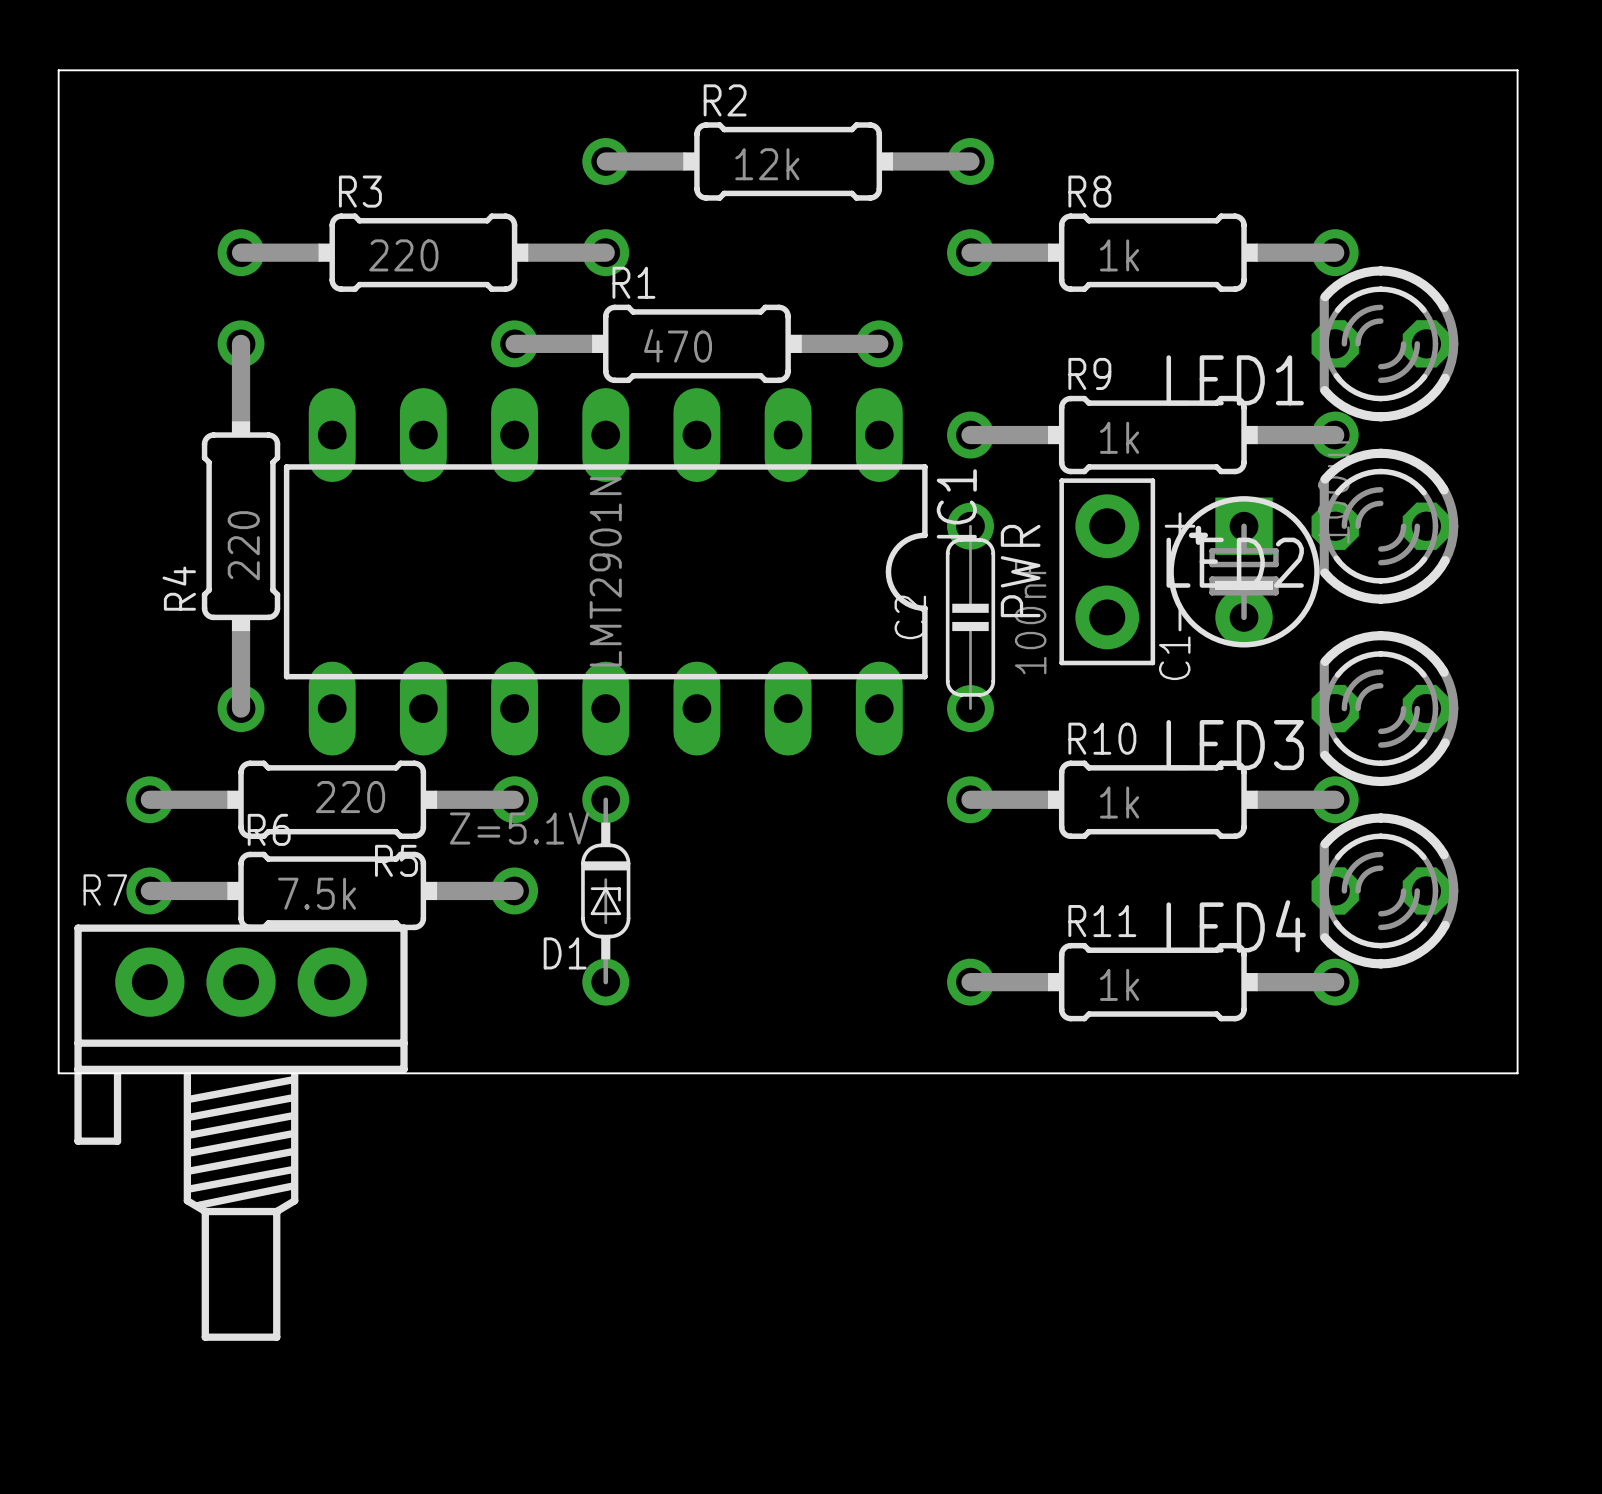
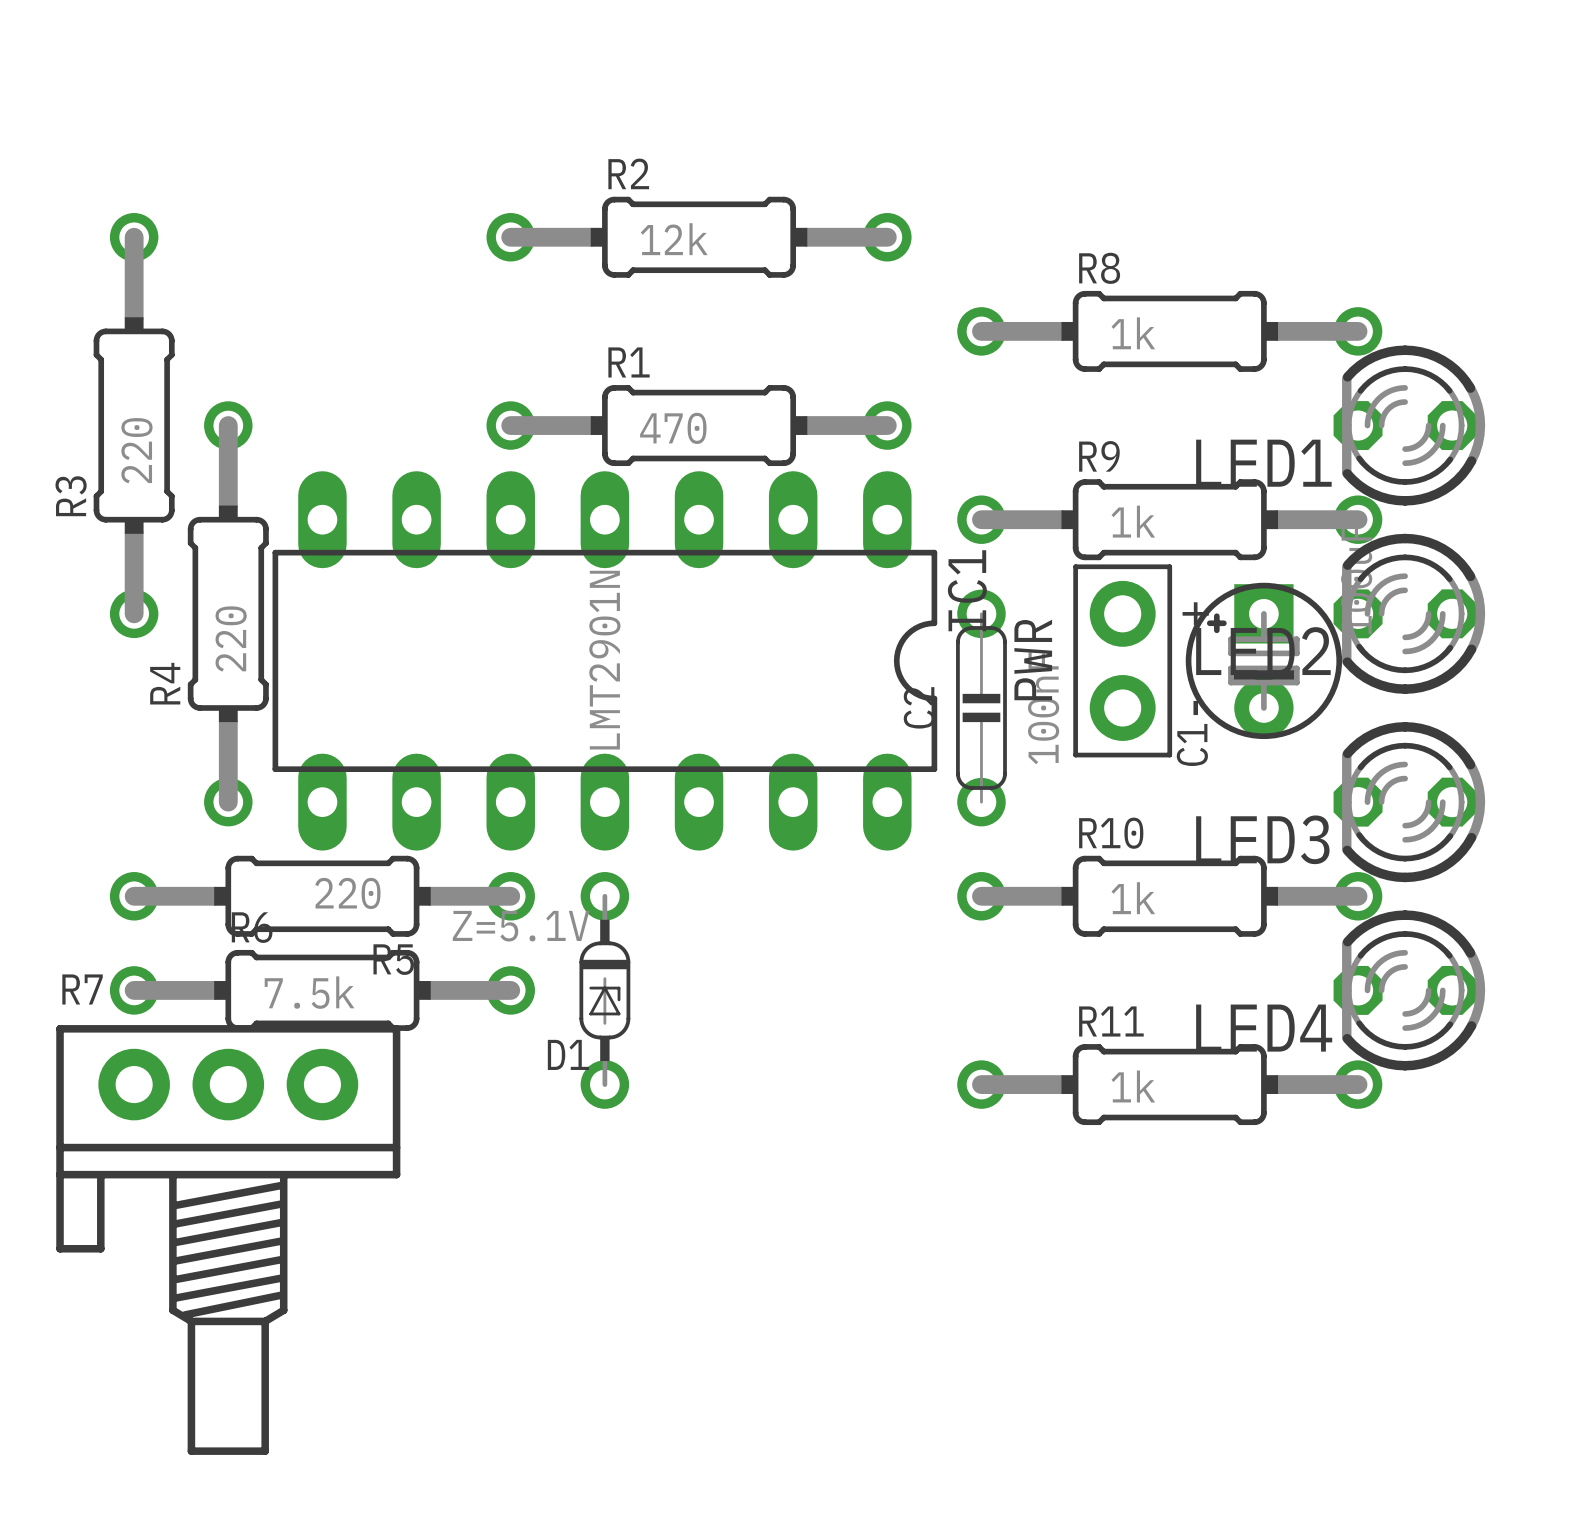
board edge: (58, 70) (1517, 70) (1517, 1073) (58, 1073) (58, 70) -> none
R2 position: (788, 161) -> (699, 237)
R3 name position: R3 (360, 191) -> R3 (71, 496)
R3 rotation: 0° (423, 252) -> 90° clockwise (134, 425)
R3 position: (423, 252) -> (134, 425)

